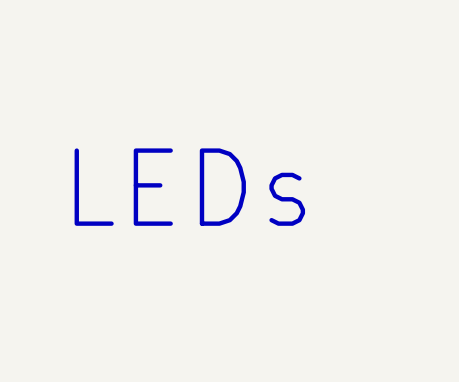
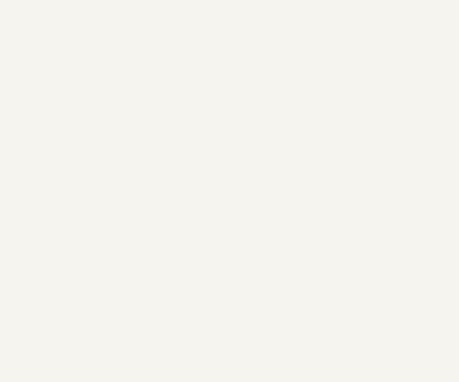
text: LEDs (189, 187) -> none

